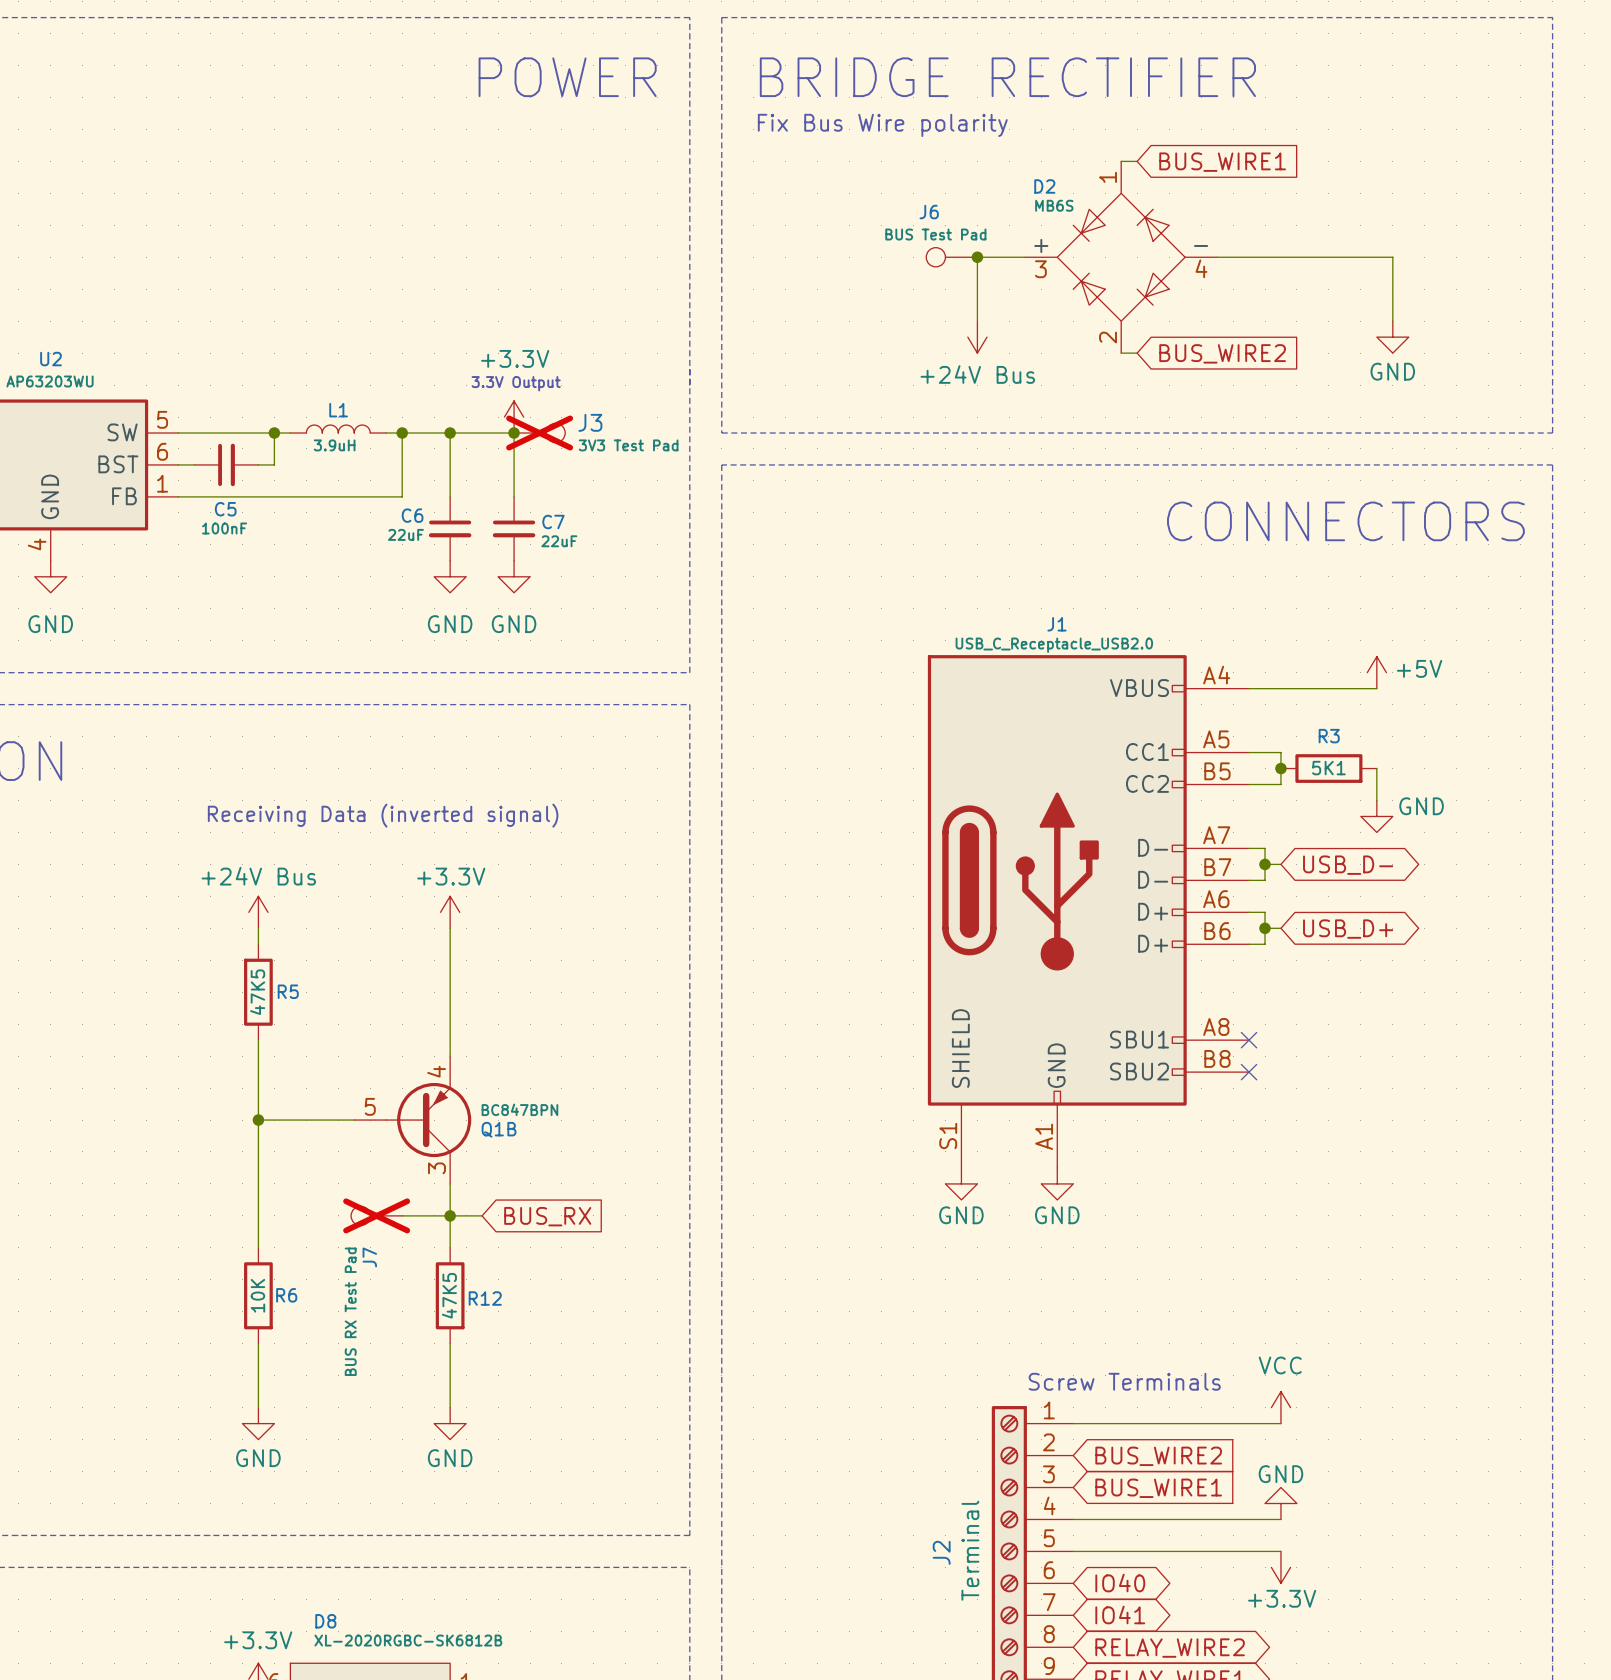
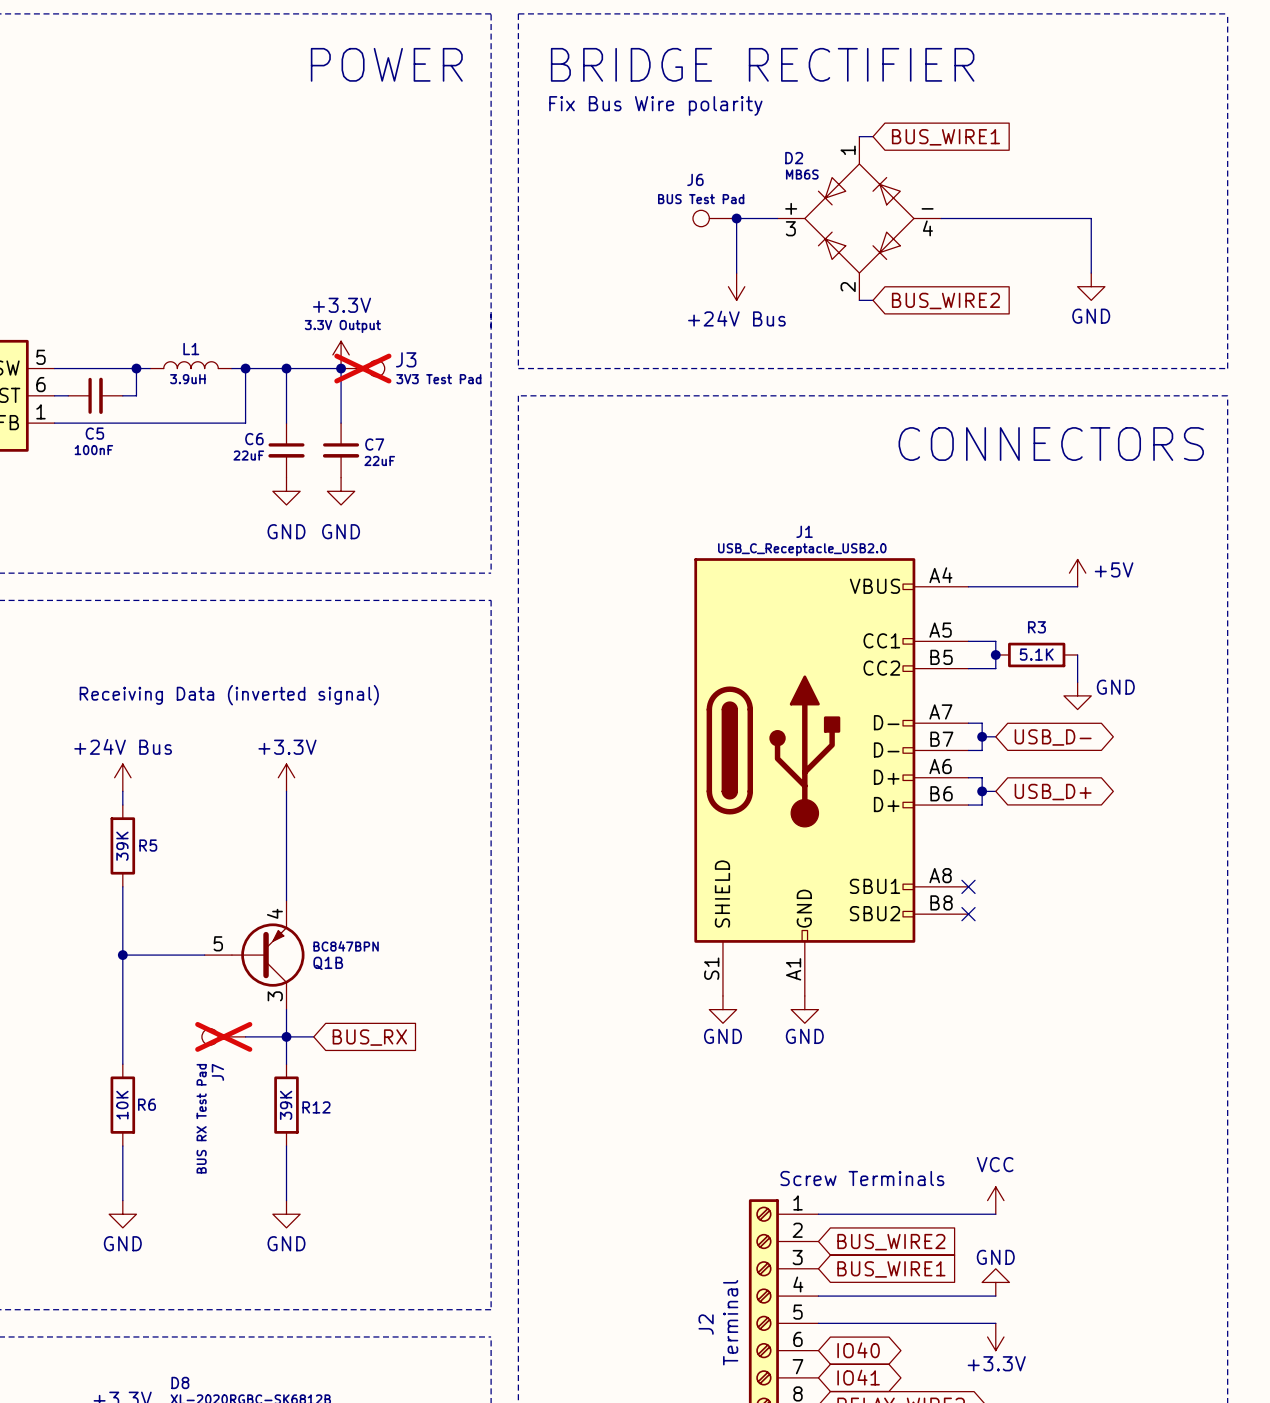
R3 value: 5K1 (1328, 768) -> 5.1K (1036, 654)
R5 value: 47K5 (257, 992) -> 39K (122, 846)
R12 value: 47K5 (449, 1295) -> 39K (286, 1105)

